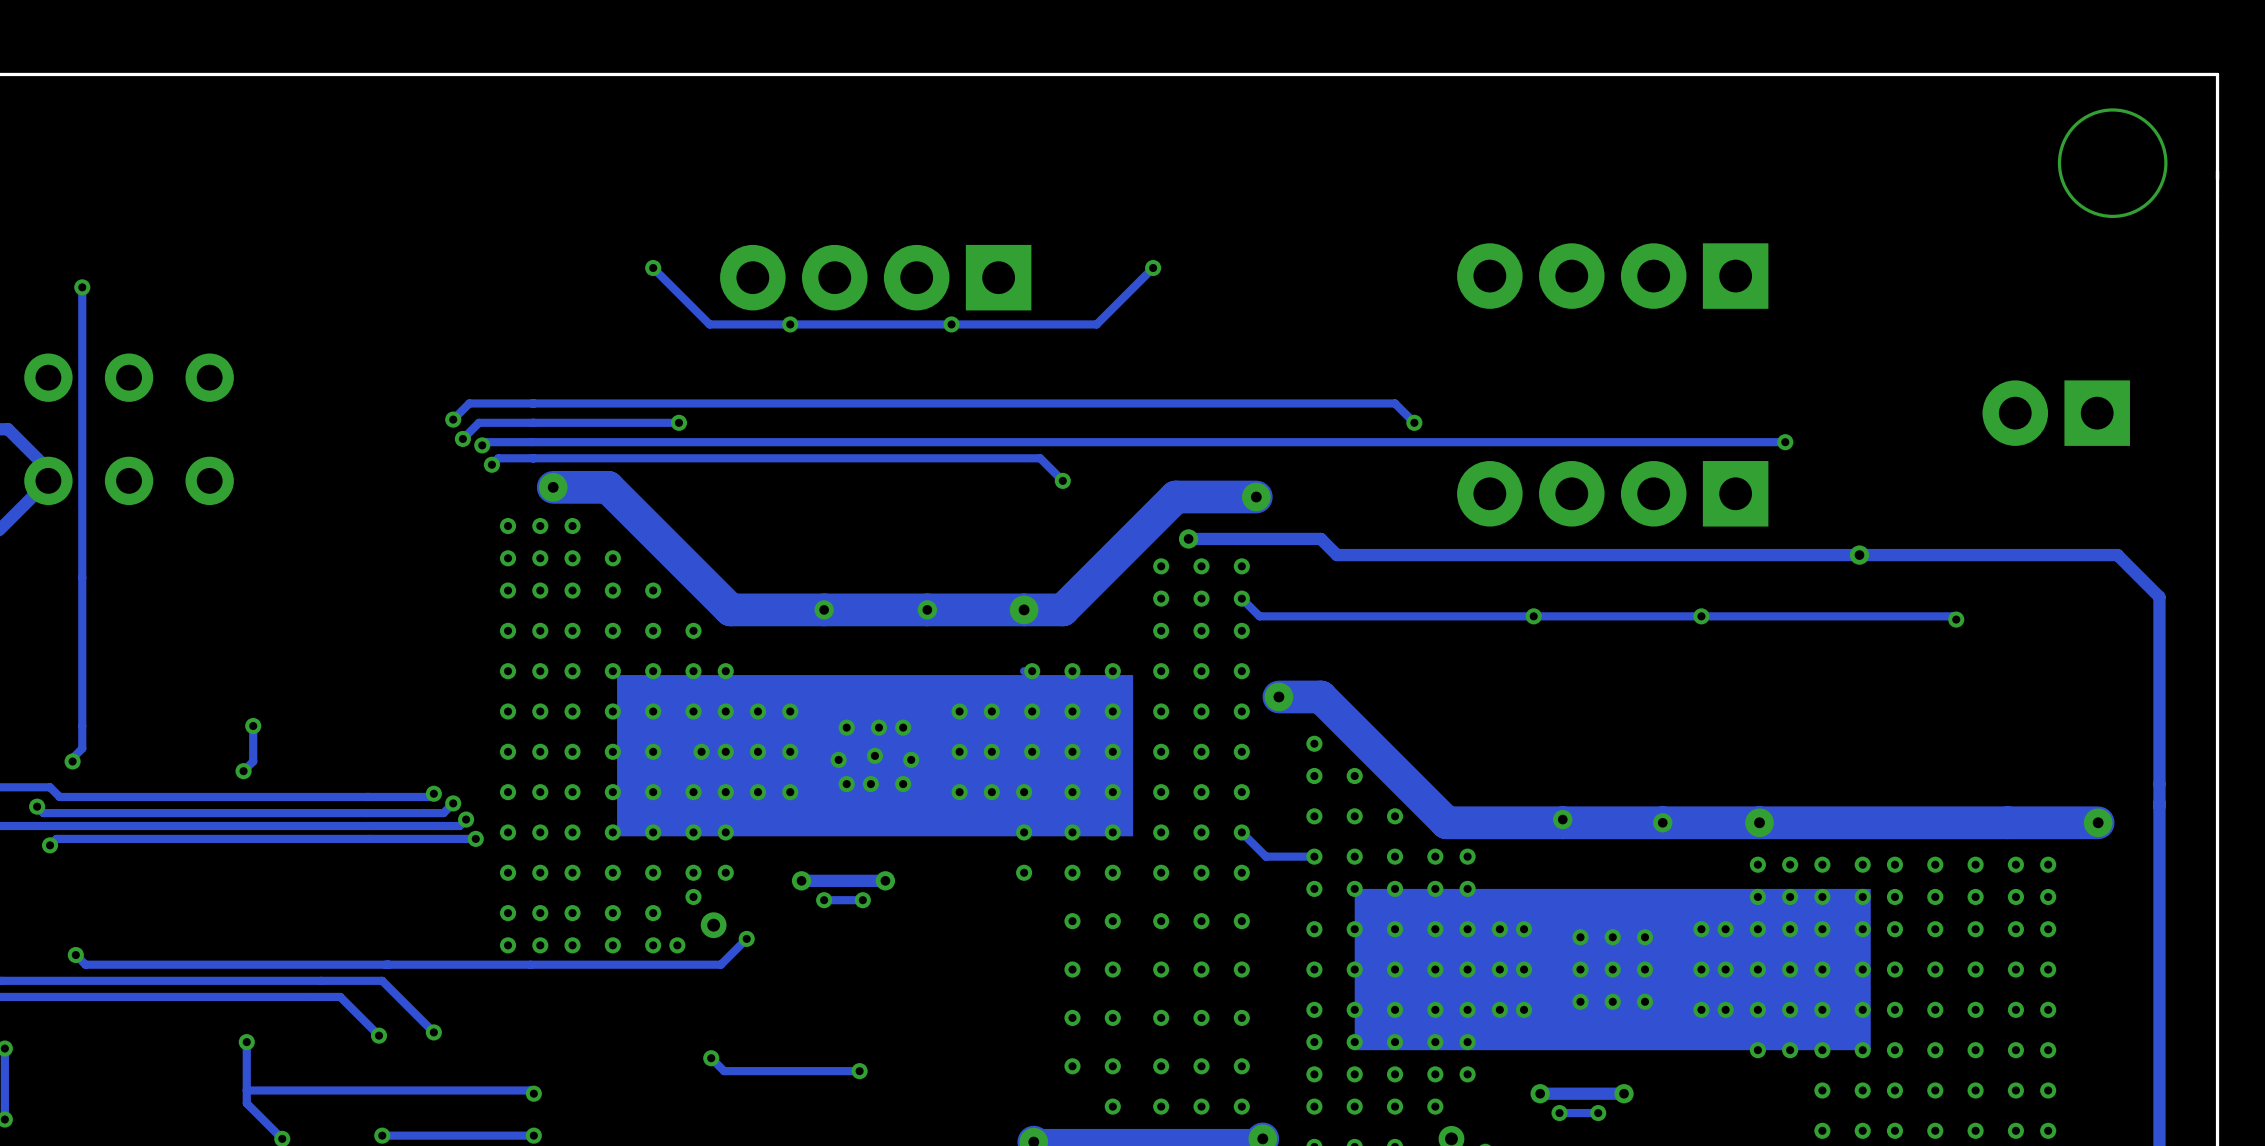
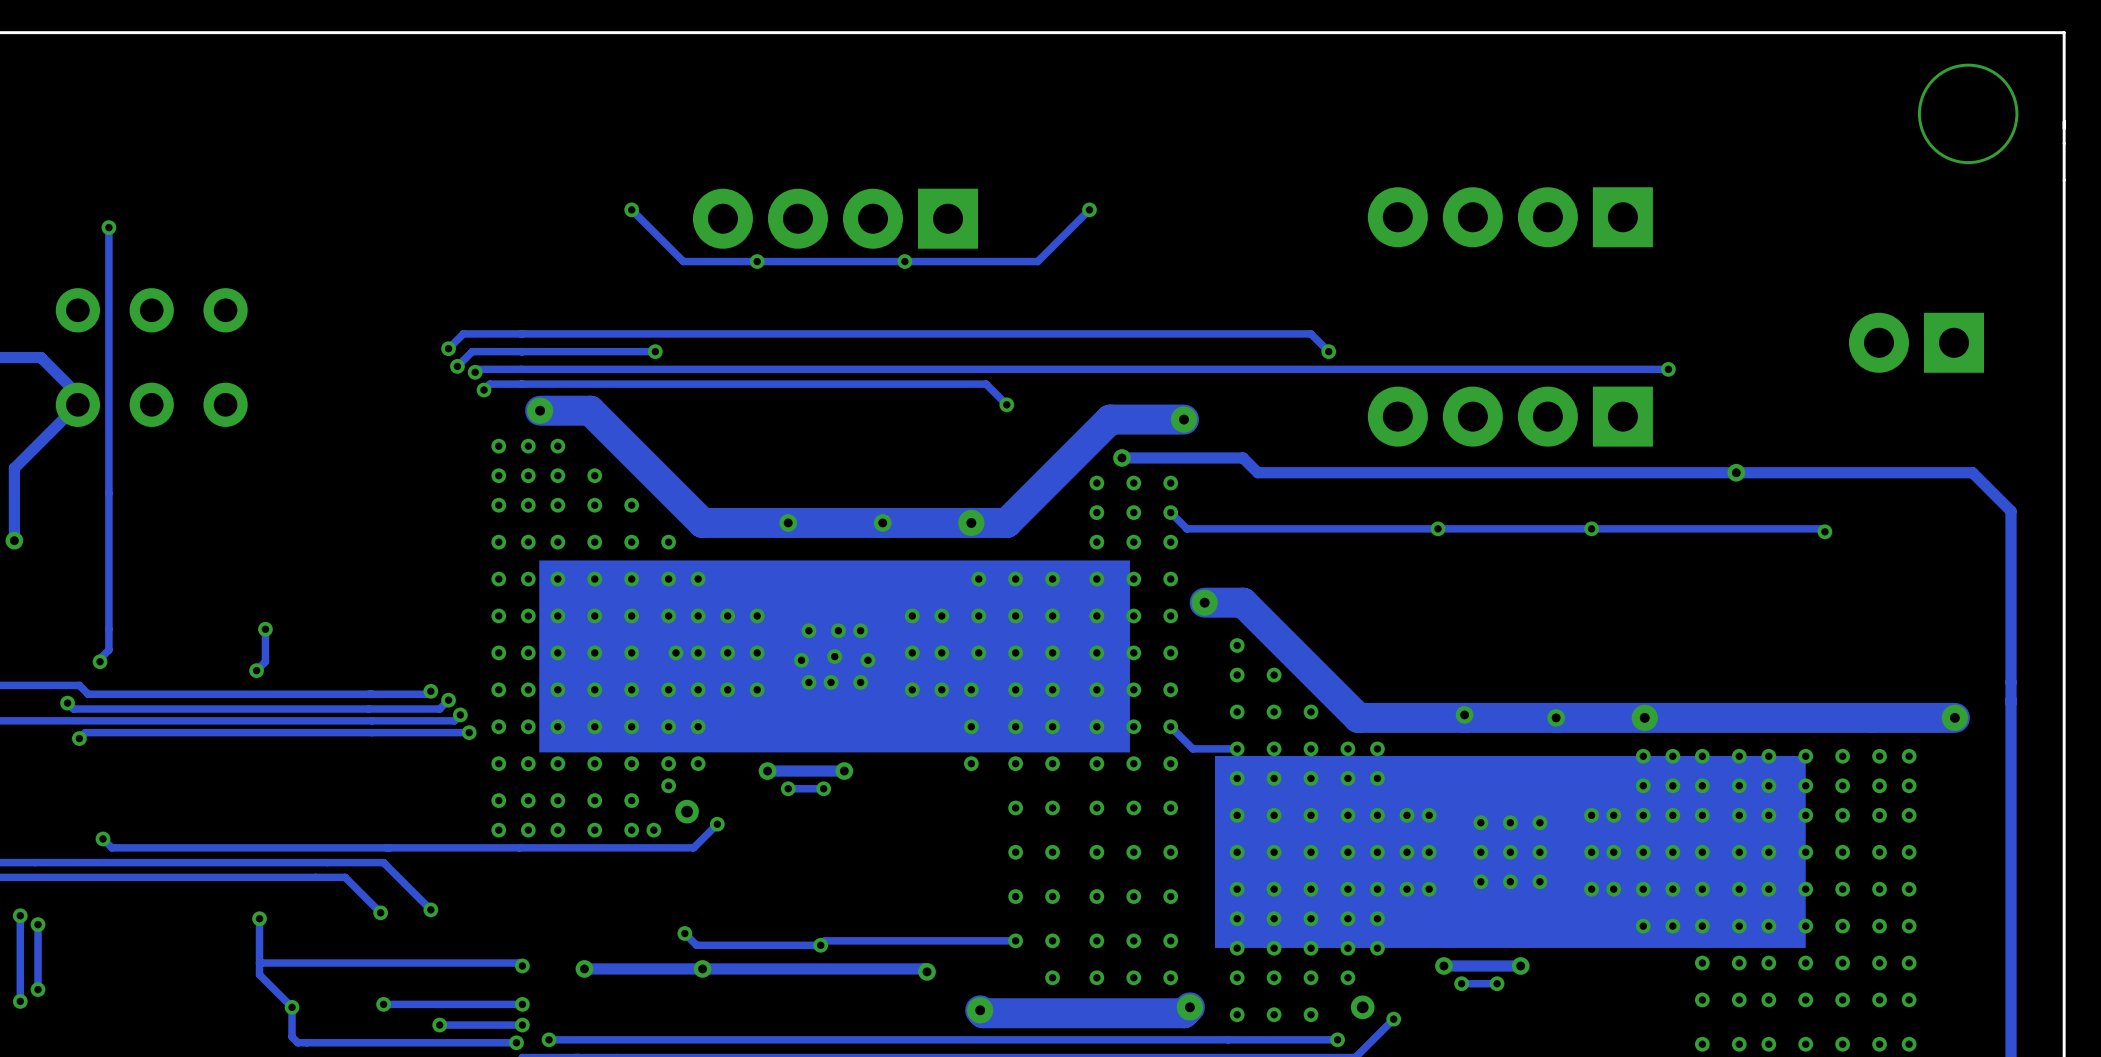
part footprint: [617, 675, 1134, 837] -> [539, 560, 1130, 753]
part footprint: [1354, 888, 1871, 1051] -> [1215, 755, 1806, 948]
track: none -> (1015, 940) (825, 940) (820, 945)
track: none -> (584, 968) (924, 968) (927, 971)
via: none -> (584, 968)
via: none -> (702, 968)
via: none -> (927, 971)

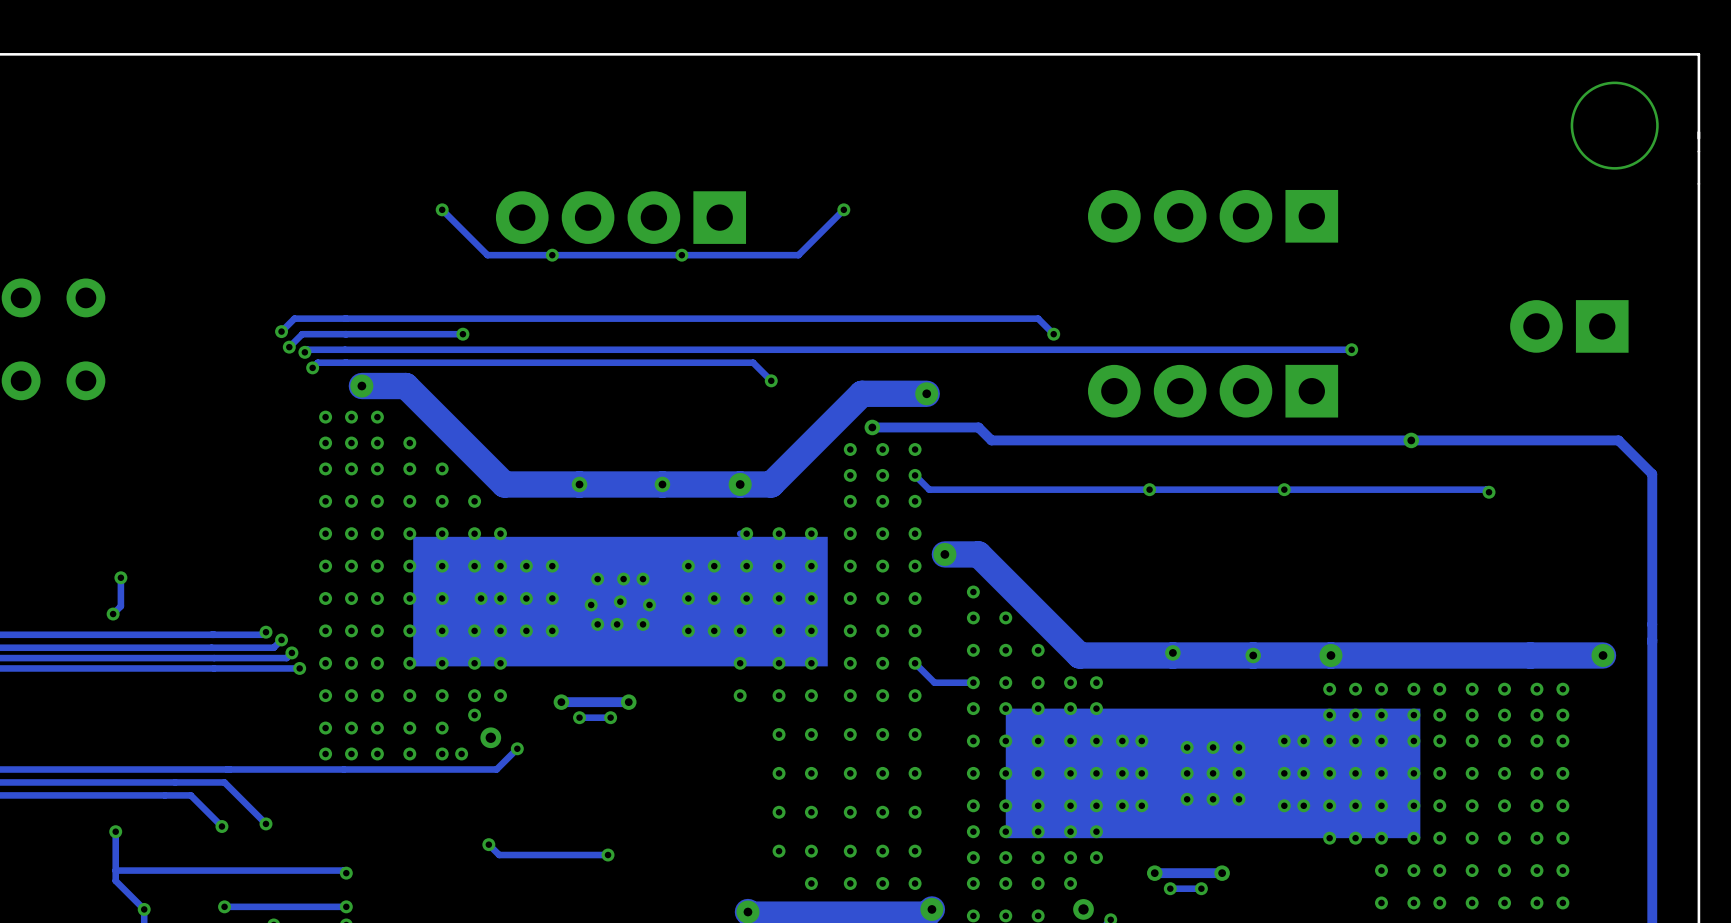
part footprint: [539, 560, 1130, 753] -> [413, 536, 828, 667]
part footprint: [1215, 755, 1806, 948] -> [1005, 708, 1421, 839]
track: (1015, 940) (825, 940) (820, 945) -> none
track: (584, 968) (924, 968) (927, 971) -> none
via: (584, 968) -> none
via: (702, 968) -> none
via: (927, 971) -> none

